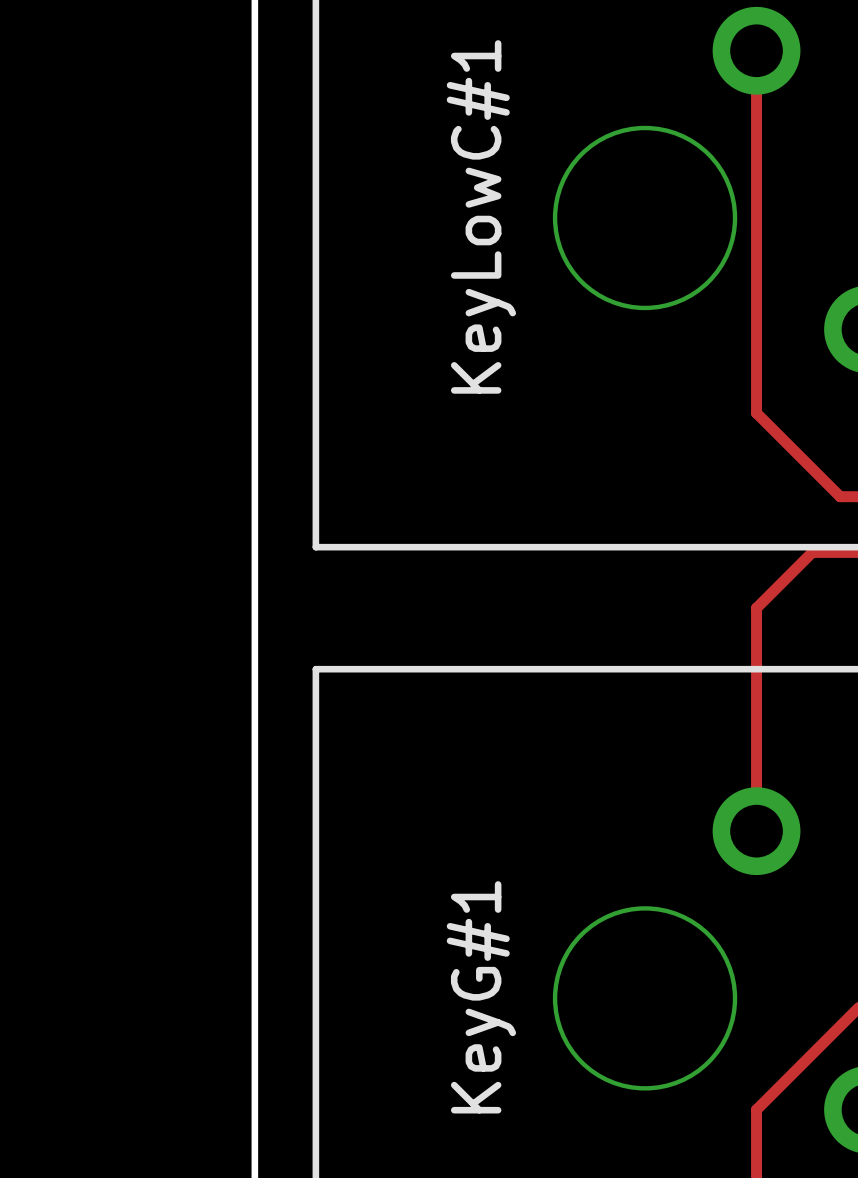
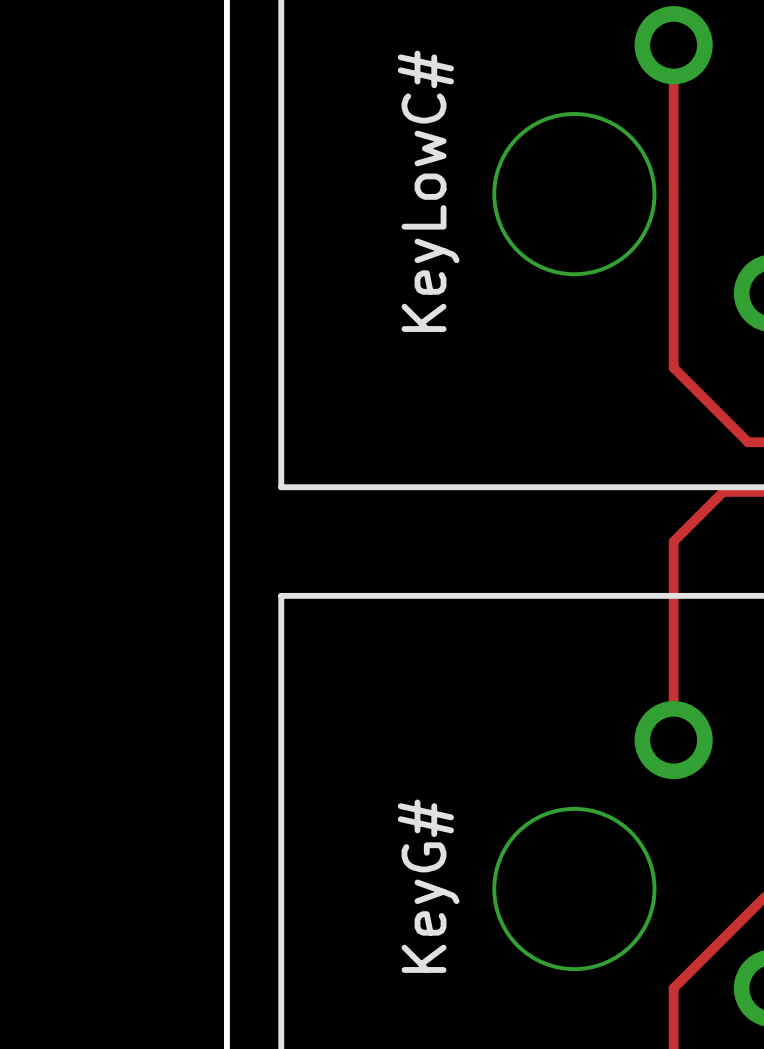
KeyLowC#1 name: KeyLowC#1 (481, 216) -> KeyLowC# (428, 191)
KeyG#1 name: KeyG#1 (481, 997) -> KeyG# (428, 886)

